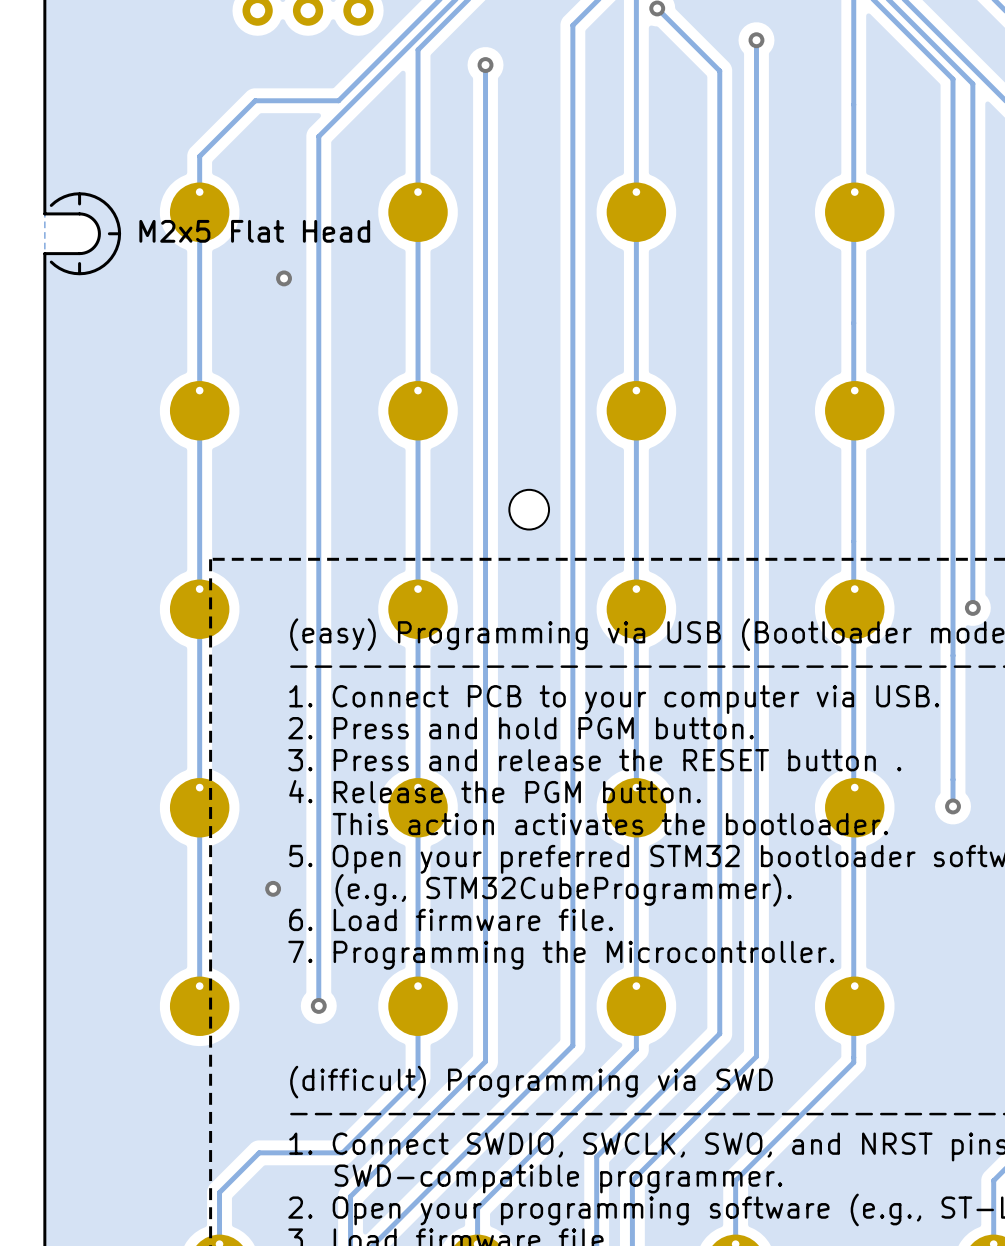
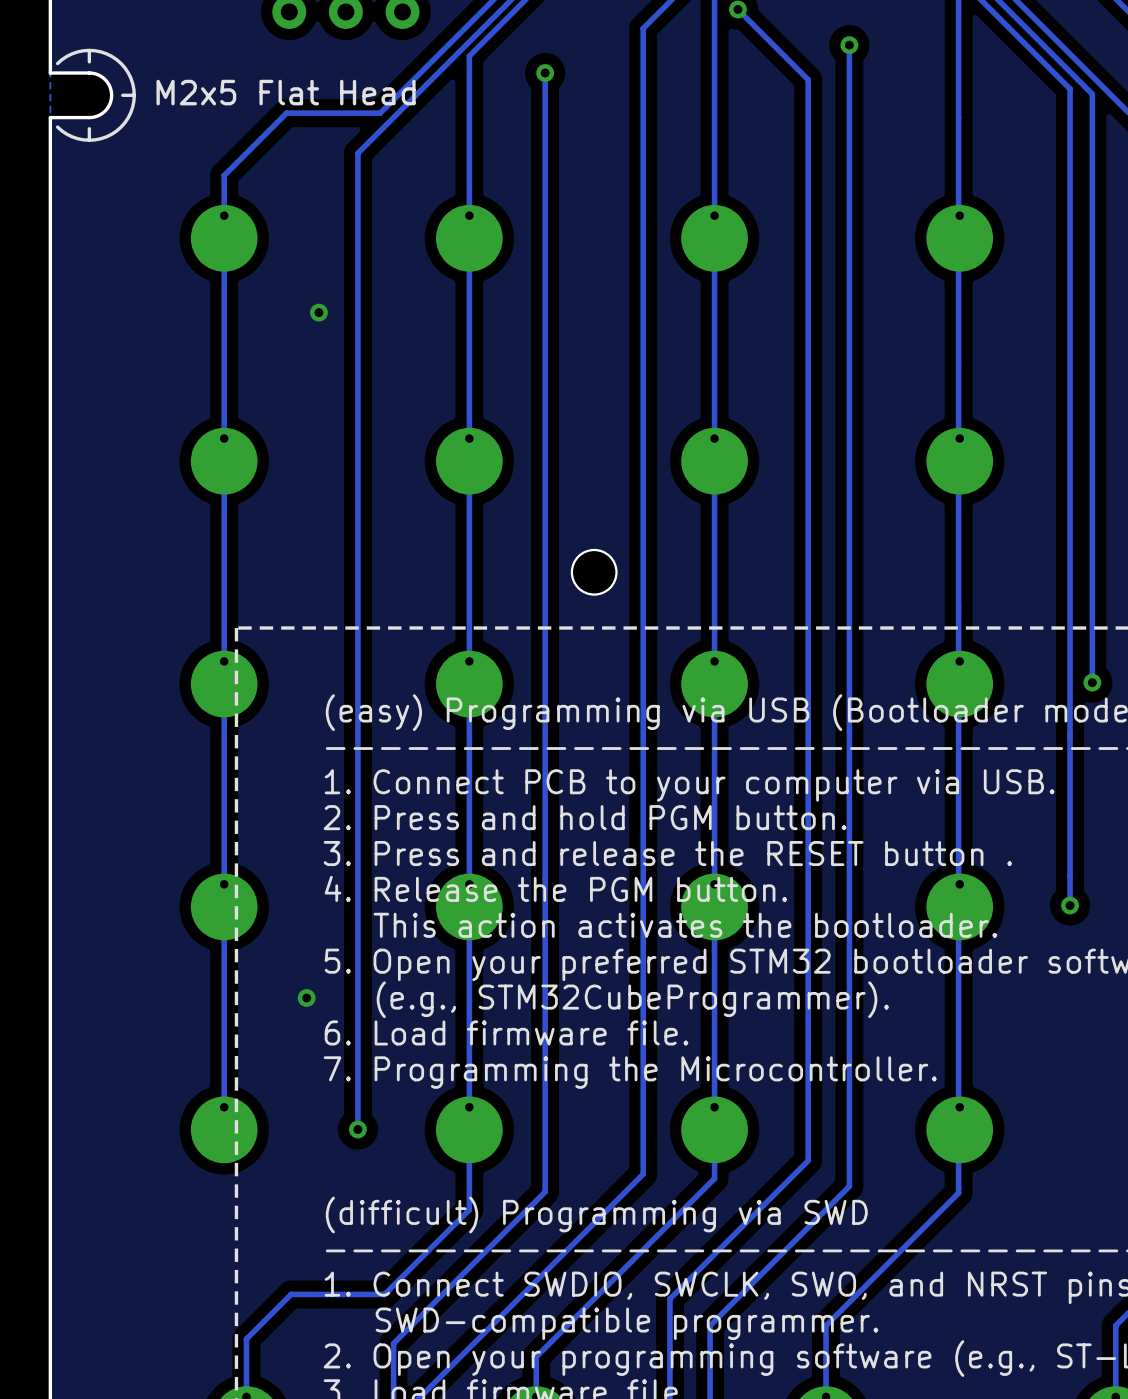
board edge: (44, 65) (44, 104) -> (50, 73) (97, 74) (108, 84) (111, 95) (108, 106) (97, 115) (50, 117)
line: (79, 194) (79, 203) -> (89, 50) (89, 61)
line: (51, 205) (64, 196) (74, 194) (94, 196) (111, 209) (116, 218) (119, 233) (114, 253) (107, 262) (94, 270) (79, 273) (69, 272) (51, 262) -> (57, 63) (72, 53) (83, 50) (95, 50) (106, 53) (116, 59) (124, 67) (130, 78) (134, 95) (132, 106) (128, 117) (121, 127) (106, 136) (89, 140) (77, 138) (66, 134) (57, 127)
board edge: (44, 213) (86, 215) (95, 222) (99, 233) (95, 245) (86, 252) (44, 253) -> (50, 240) (50, 284)
text position: M2x5 Flat Head (254, 231) -> M2x5 Flat Head (286, 92)
line: (119, 233) (109, 233) -> (134, 95) (122, 95)
line: (79, 263) (79, 273) -> (89, 128) (89, 139)

